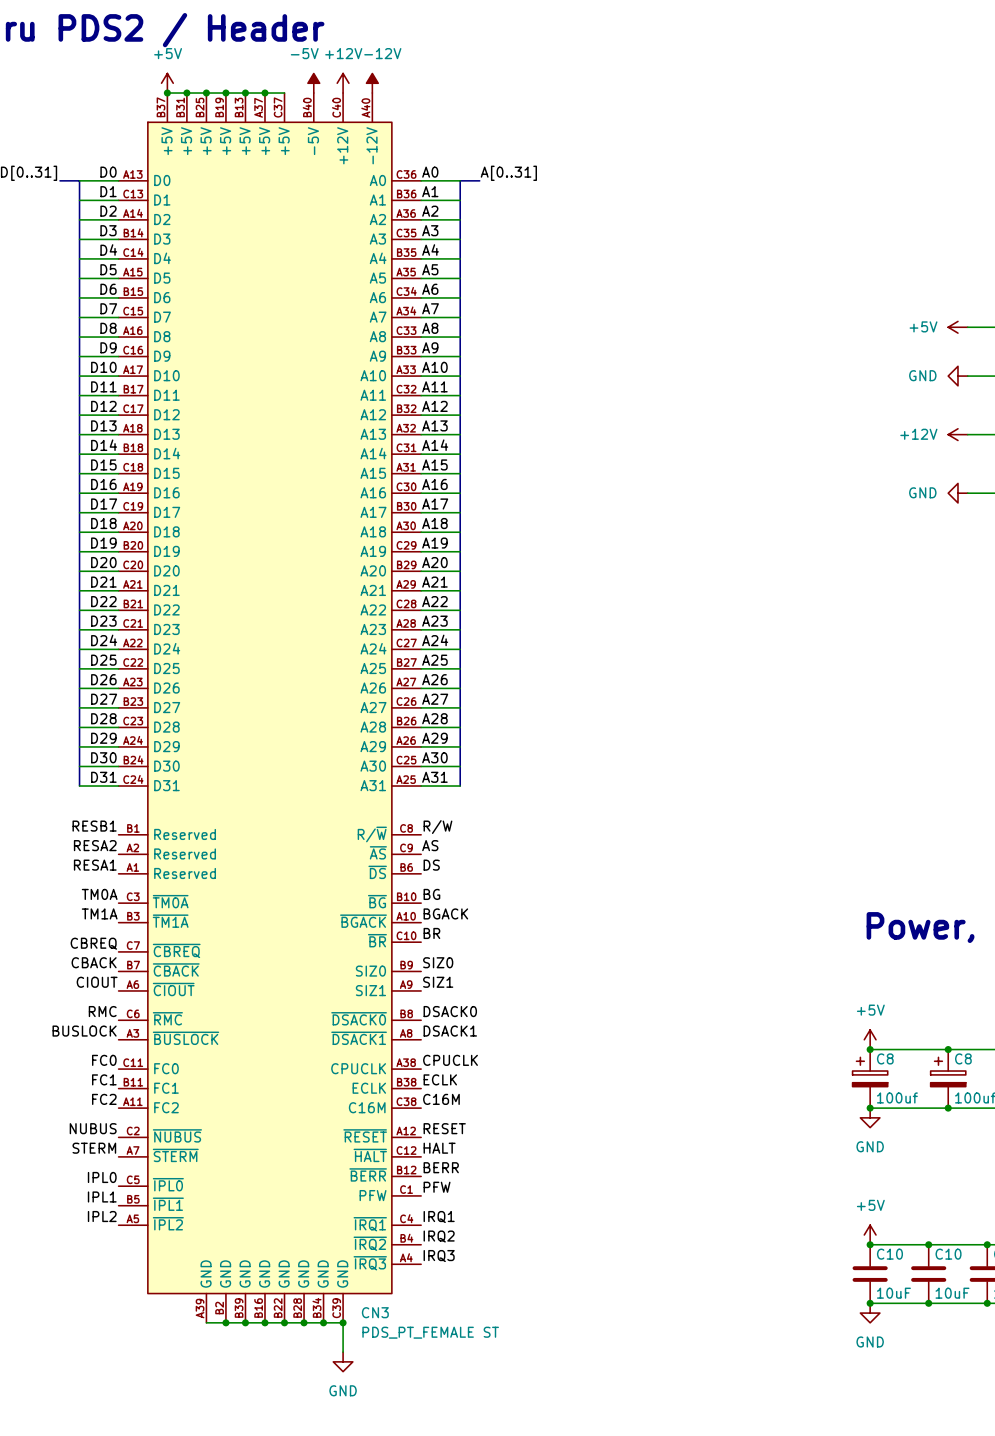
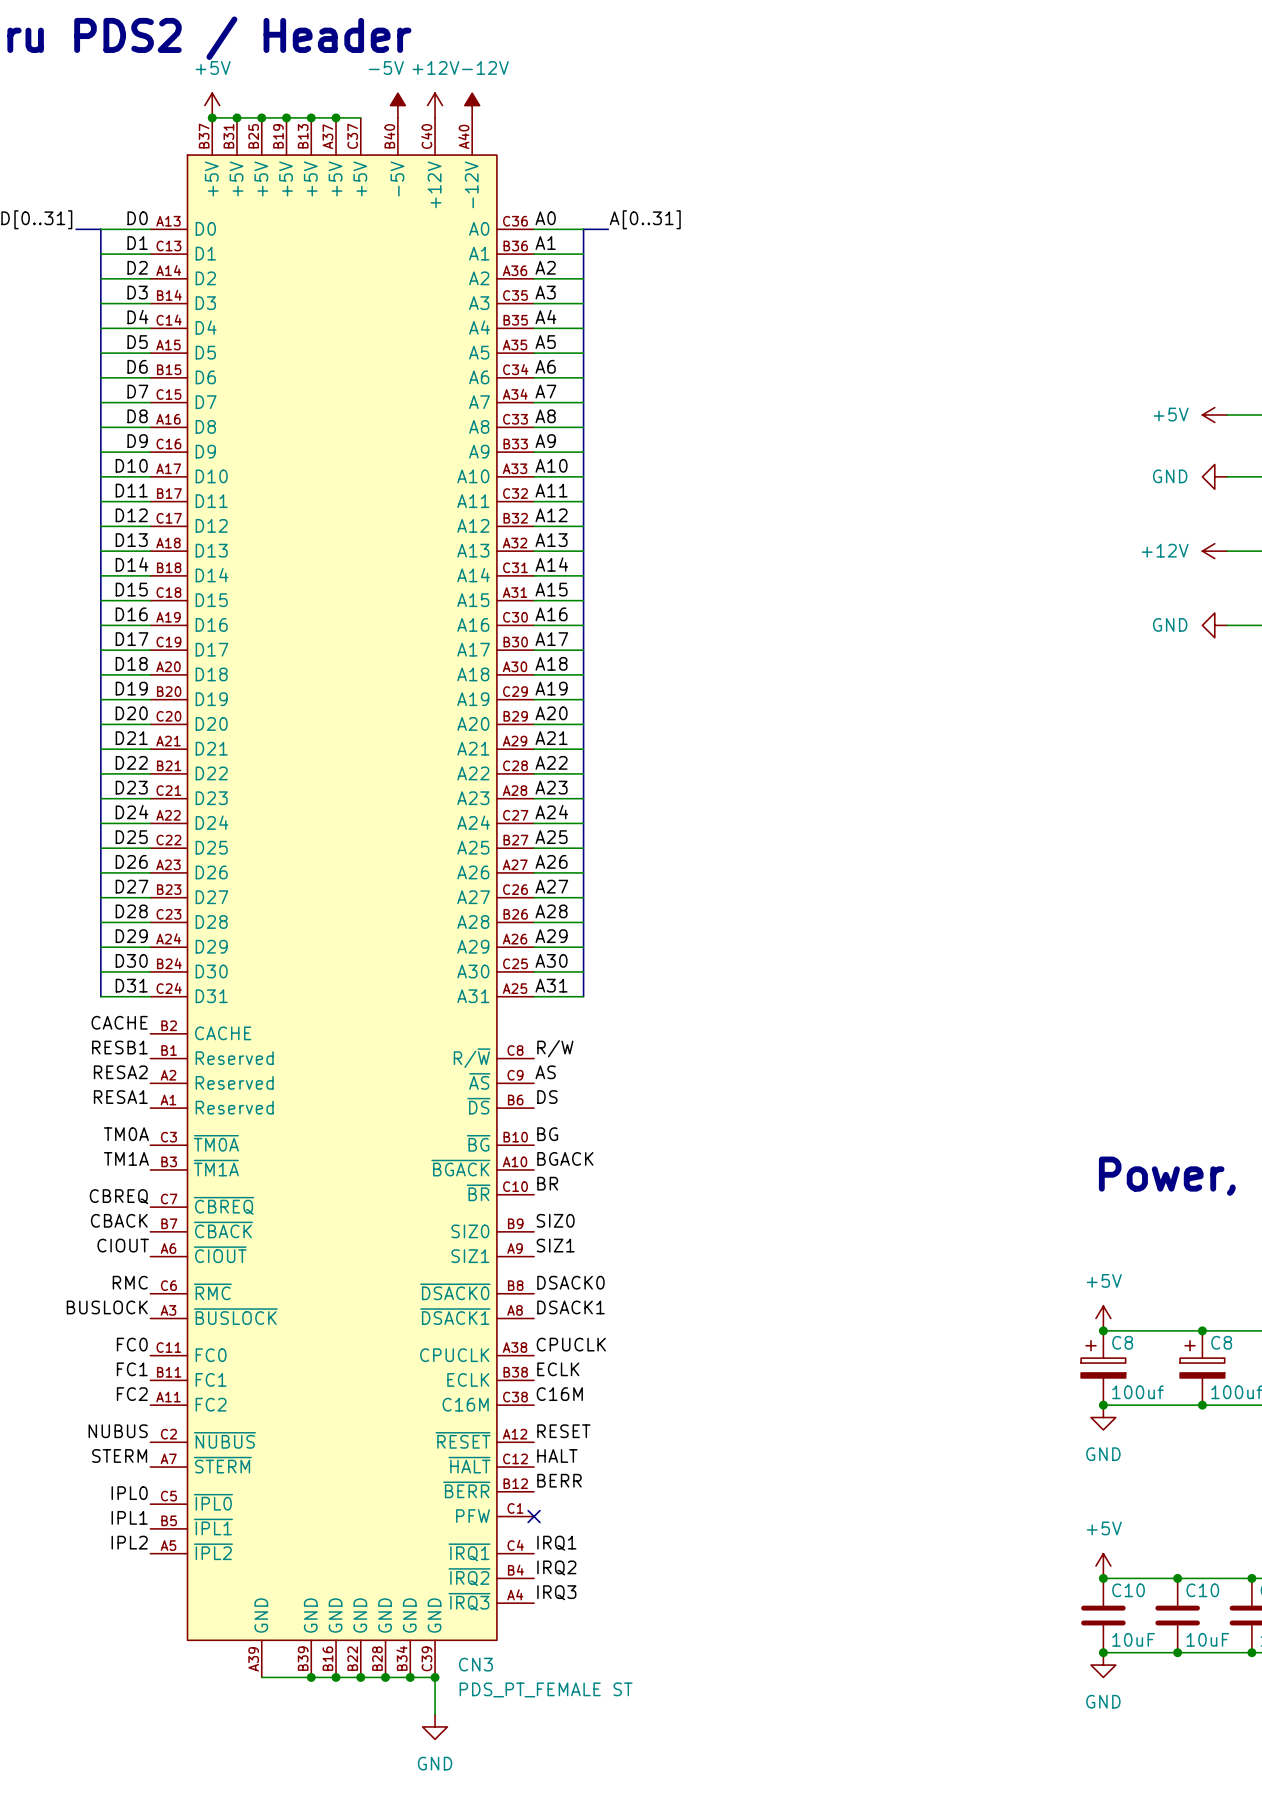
CN3 symbol: [118, 93, 422, 1323] -> [150, 117, 535, 1678]
label: none -> CACHE (119, 1022)
label: PFW (437, 1187) -> none
no-connect mark: none -> (534, 1516)
junction: (225, 1322) -> none

